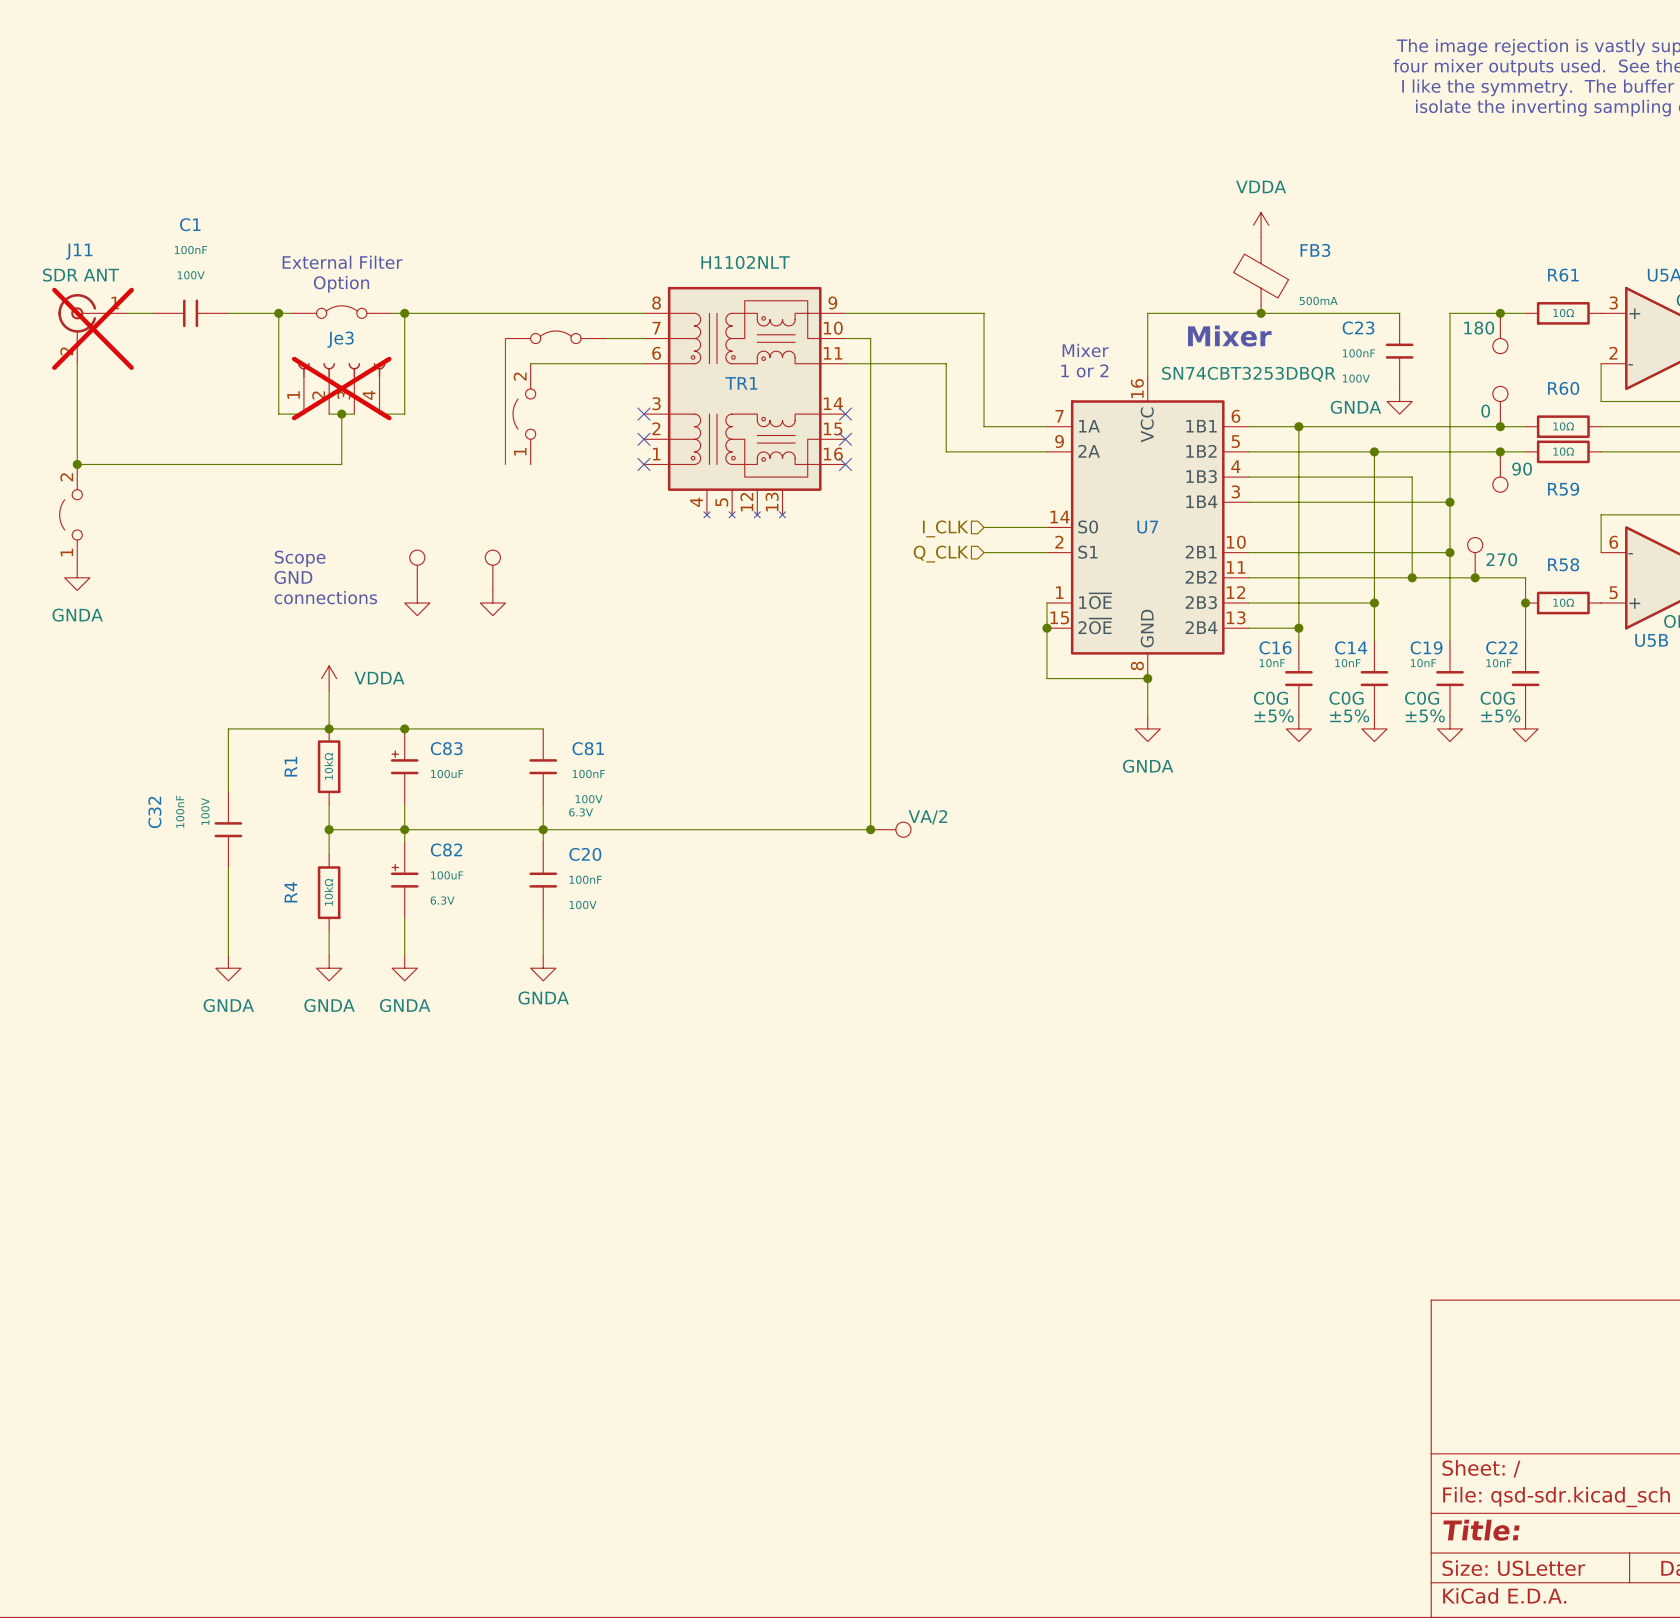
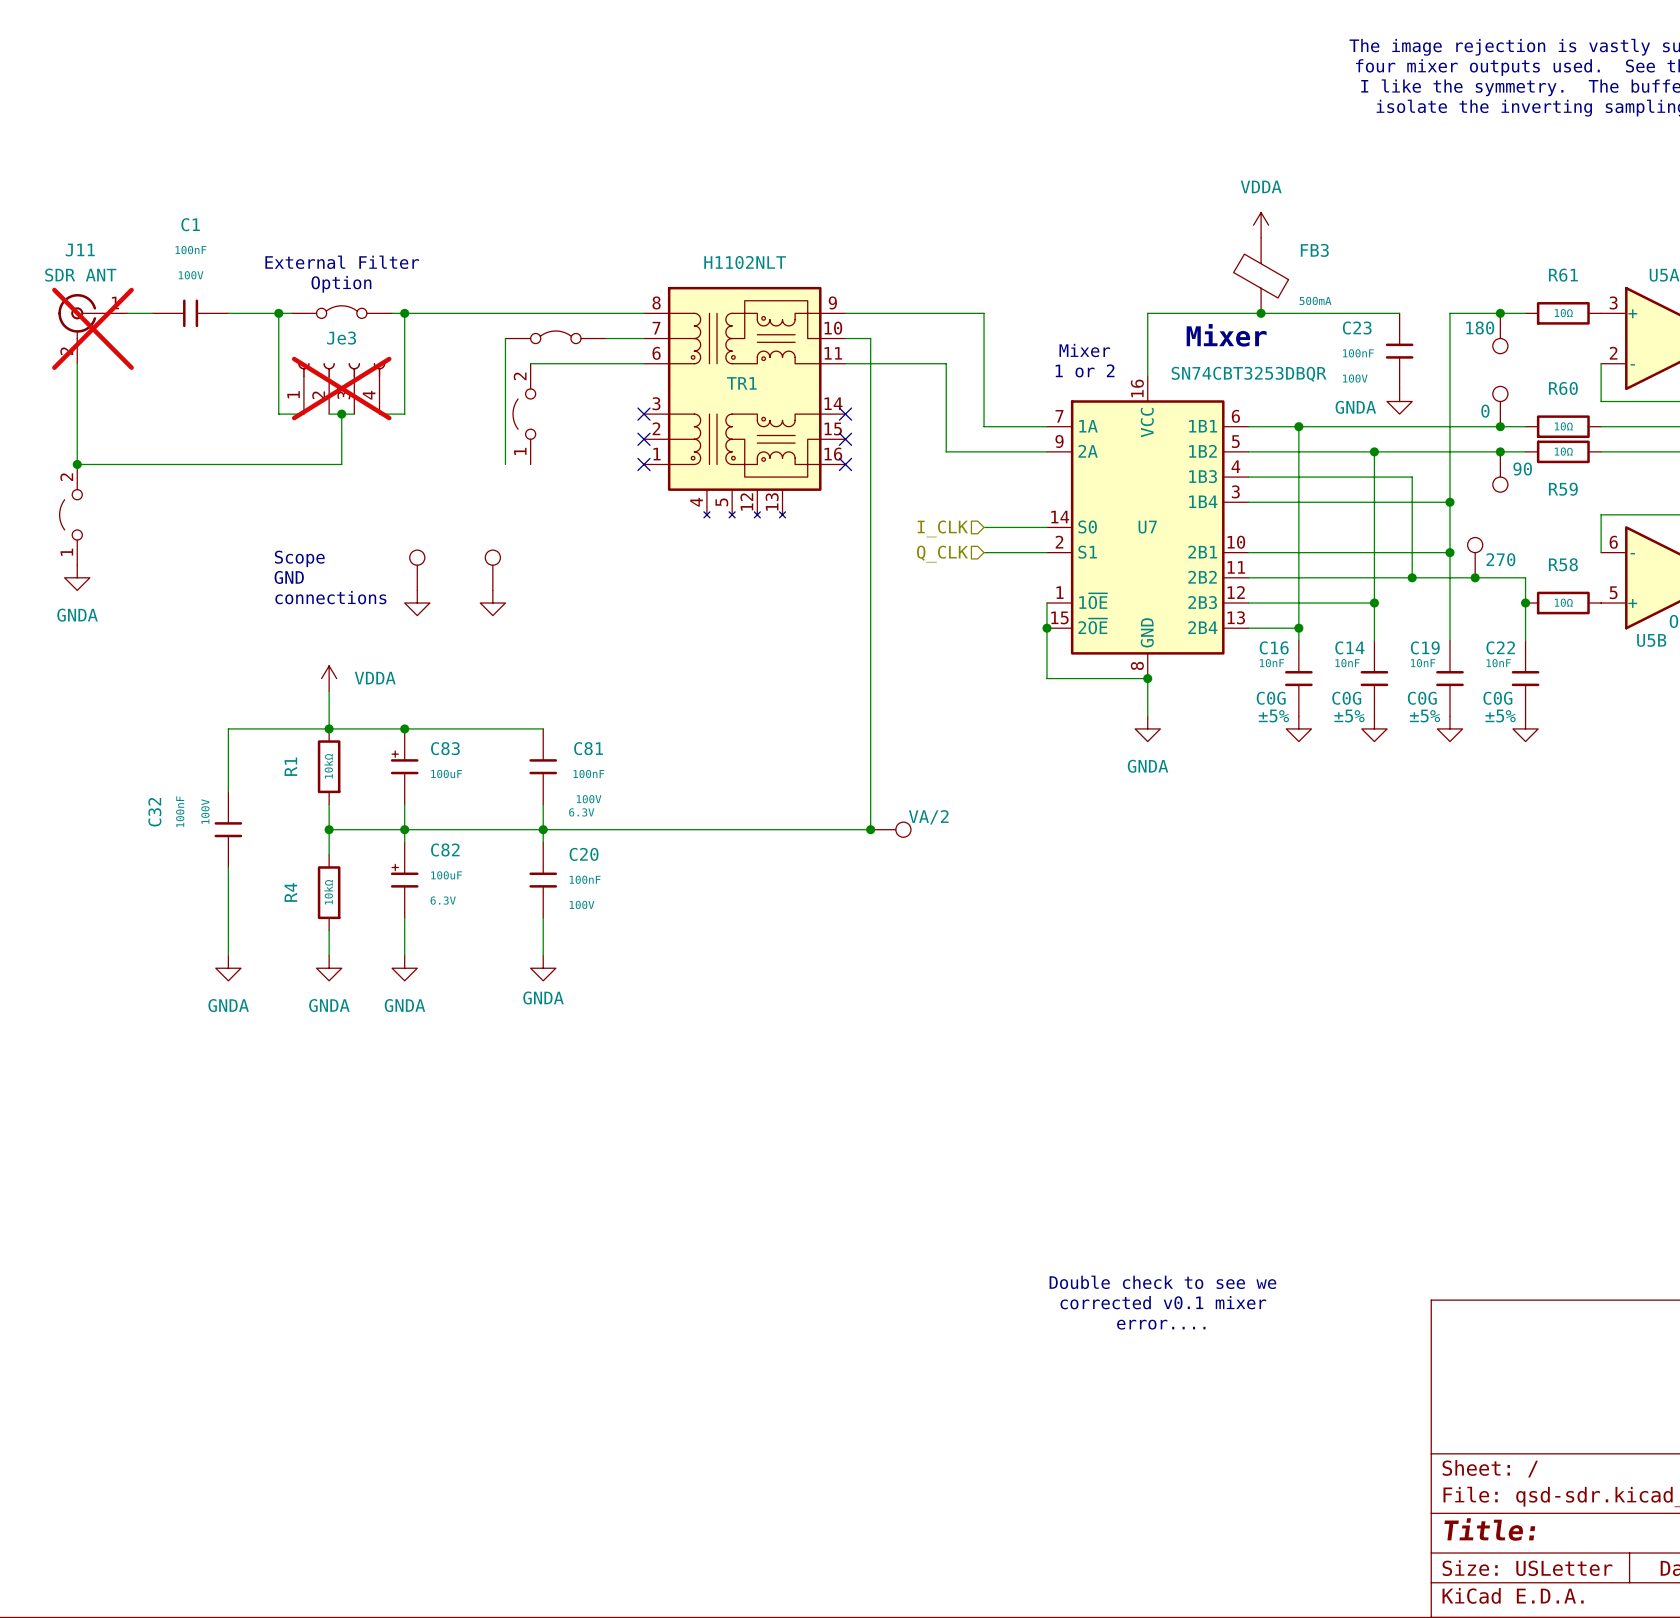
text: none -> Double check to see we (1162, 1282)
text: none -> corrected v0.1 mixer (1163, 1302)
text: none -> error.... (1161, 1324)

